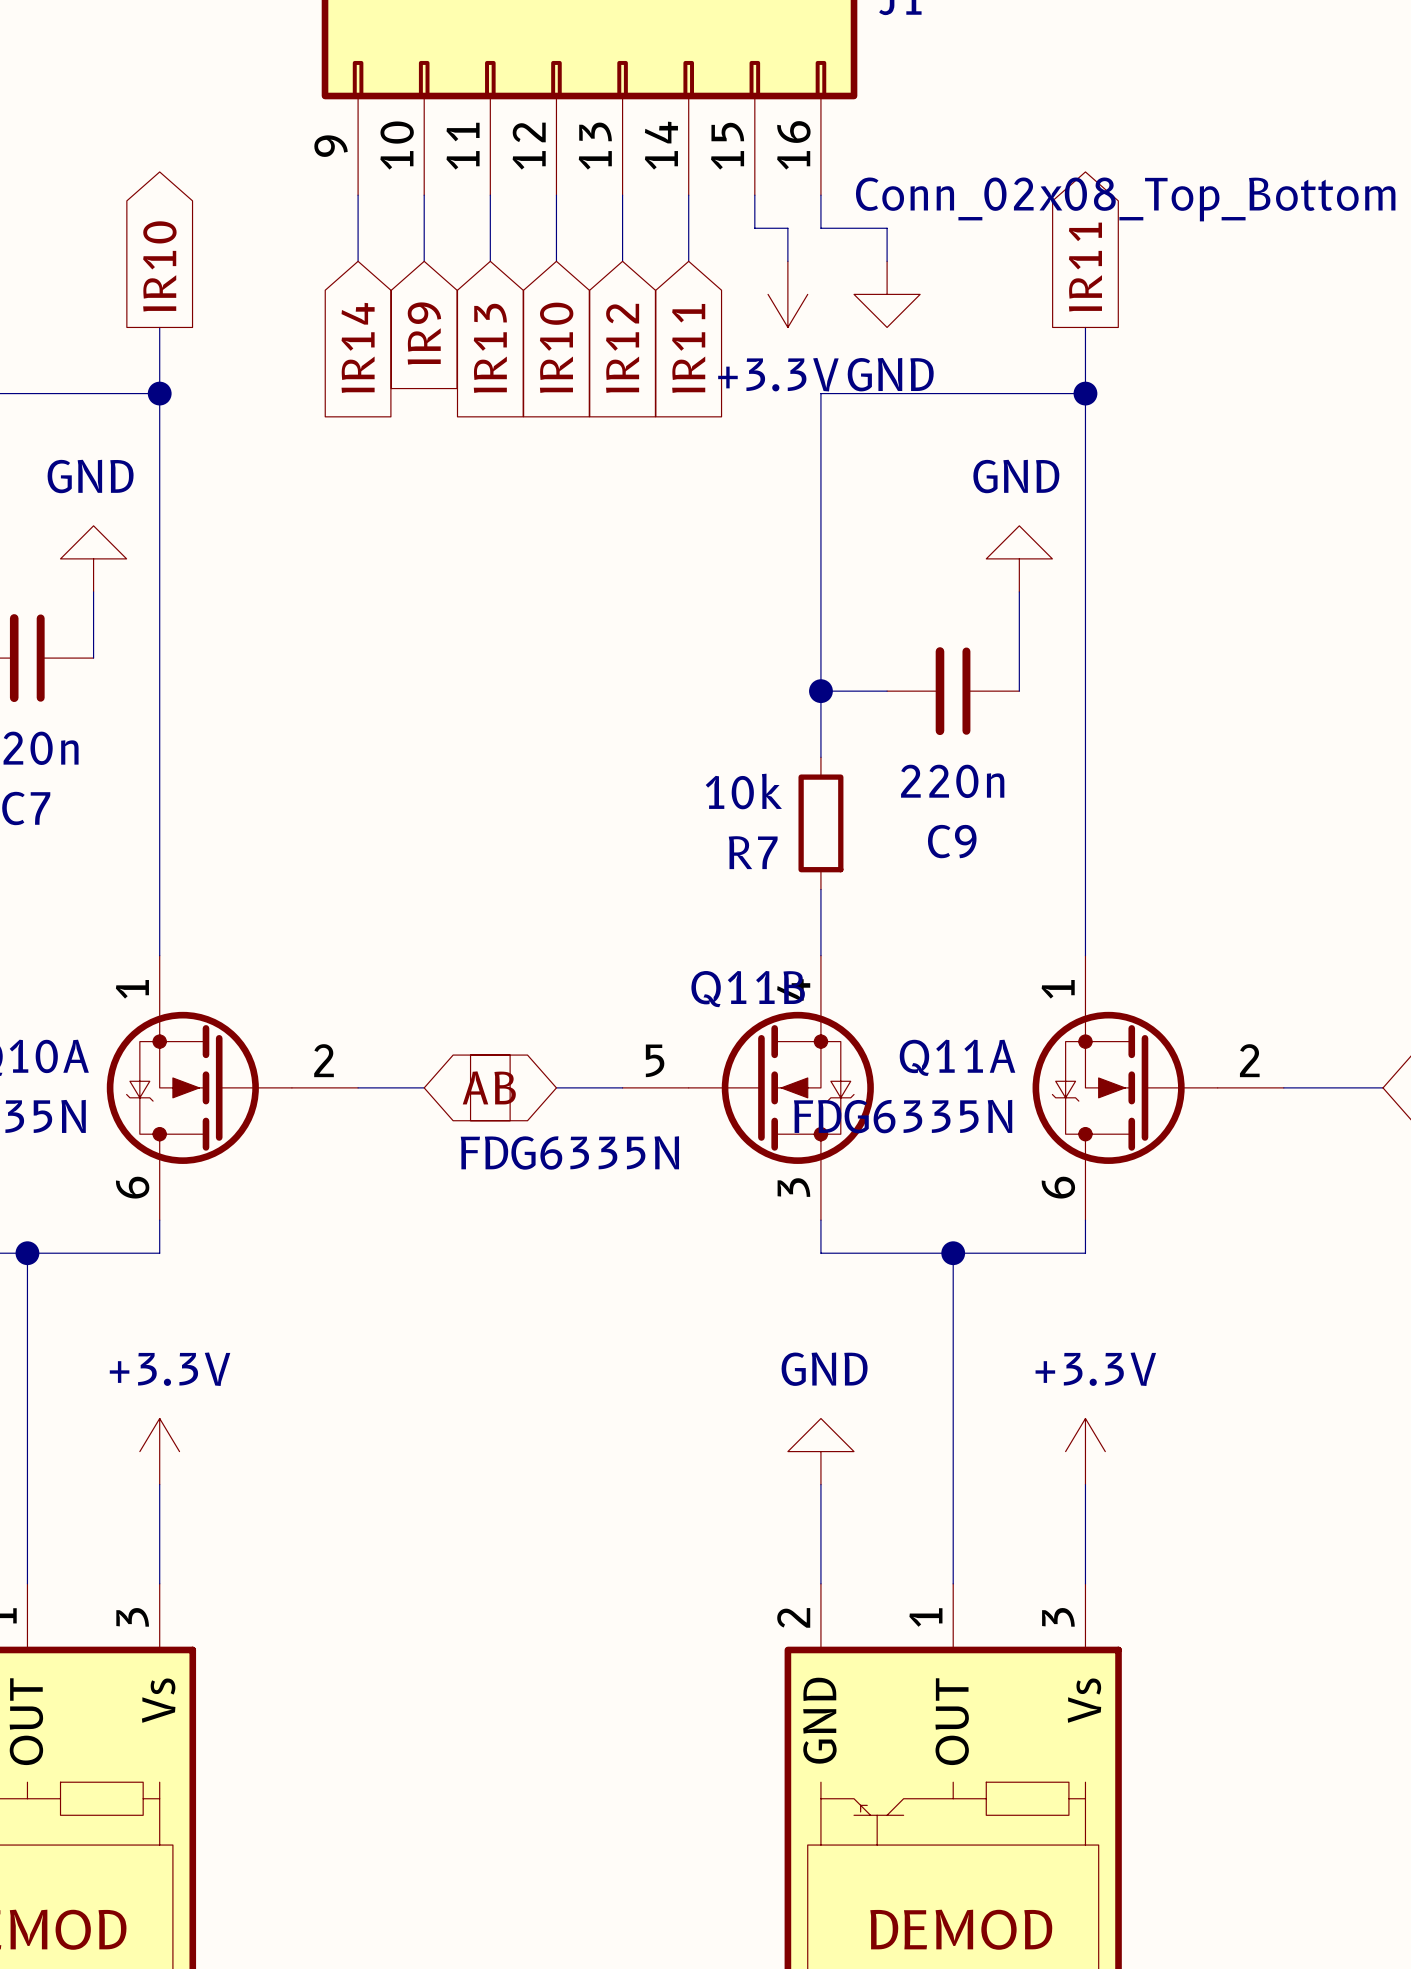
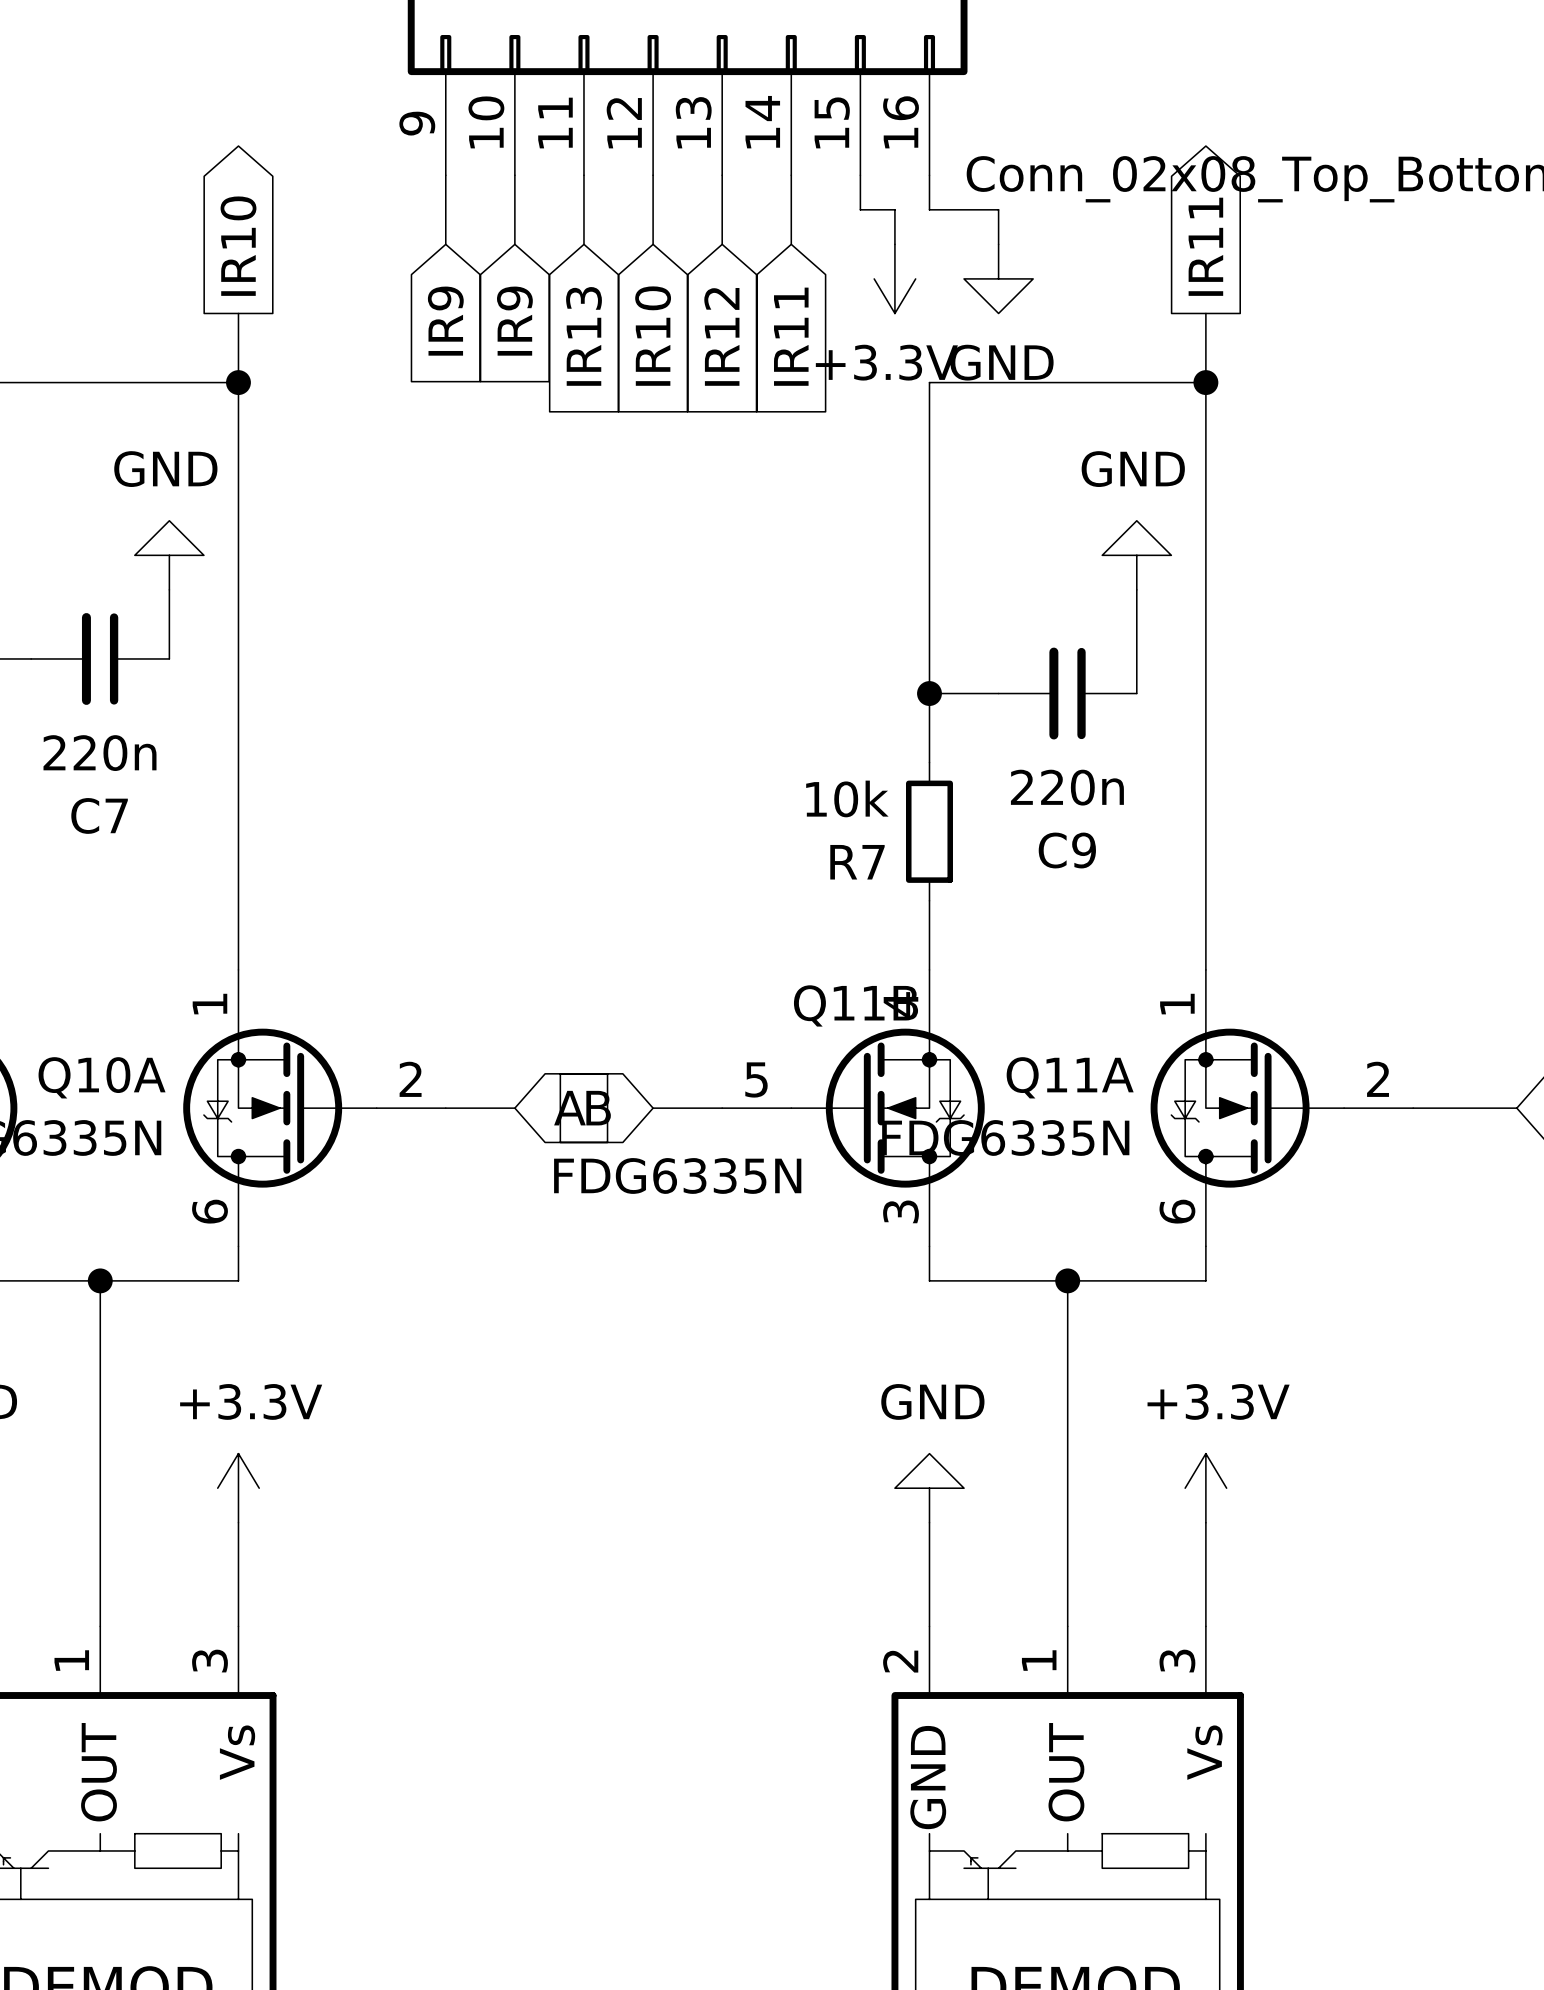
global label: IR14 (358, 347) -> IR9 (445, 321)

